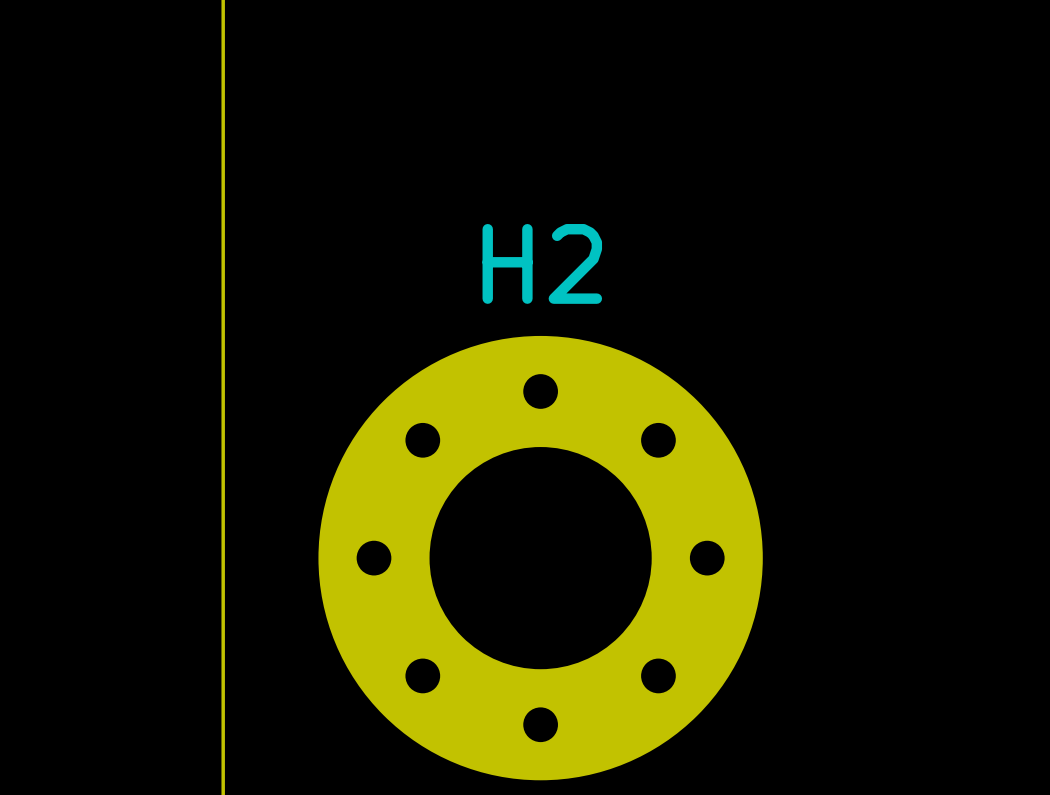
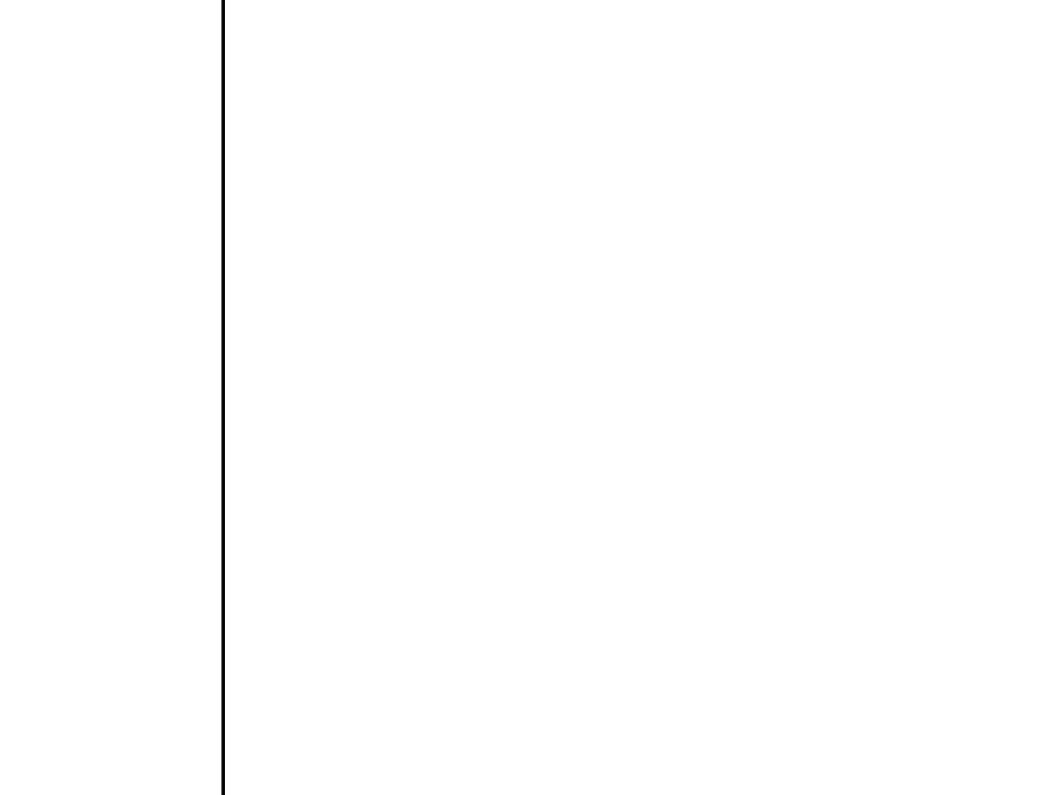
H2: (540, 558) -> none

